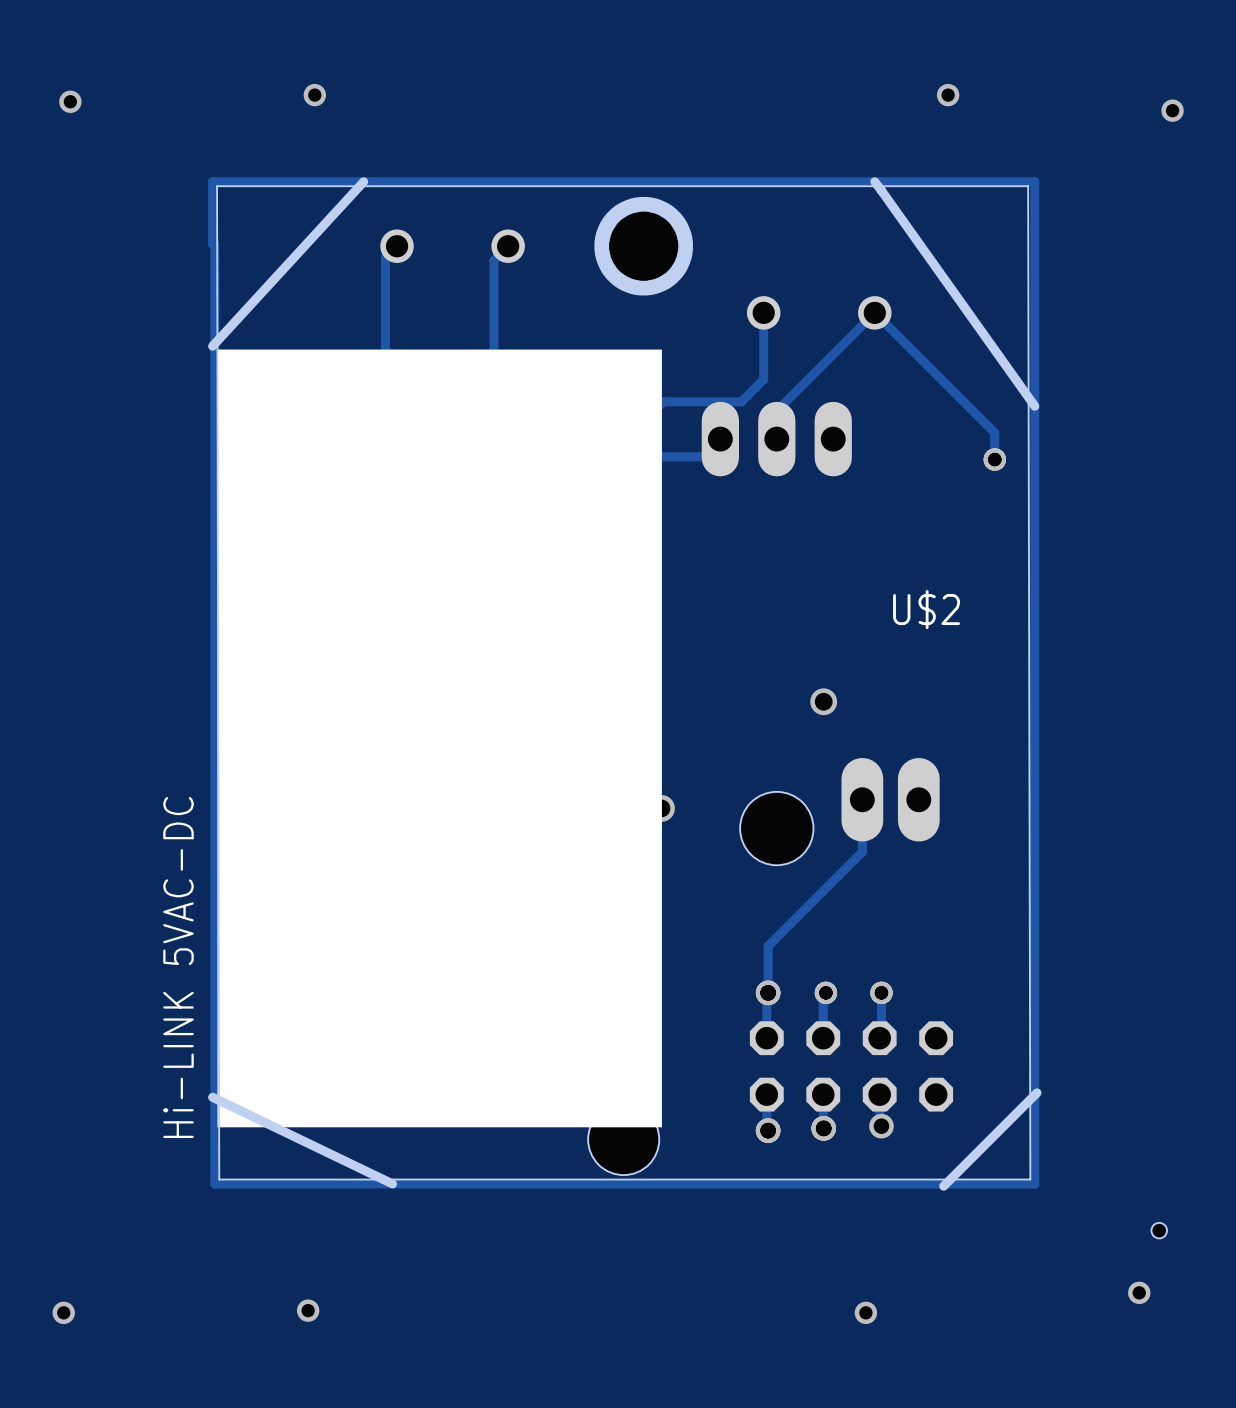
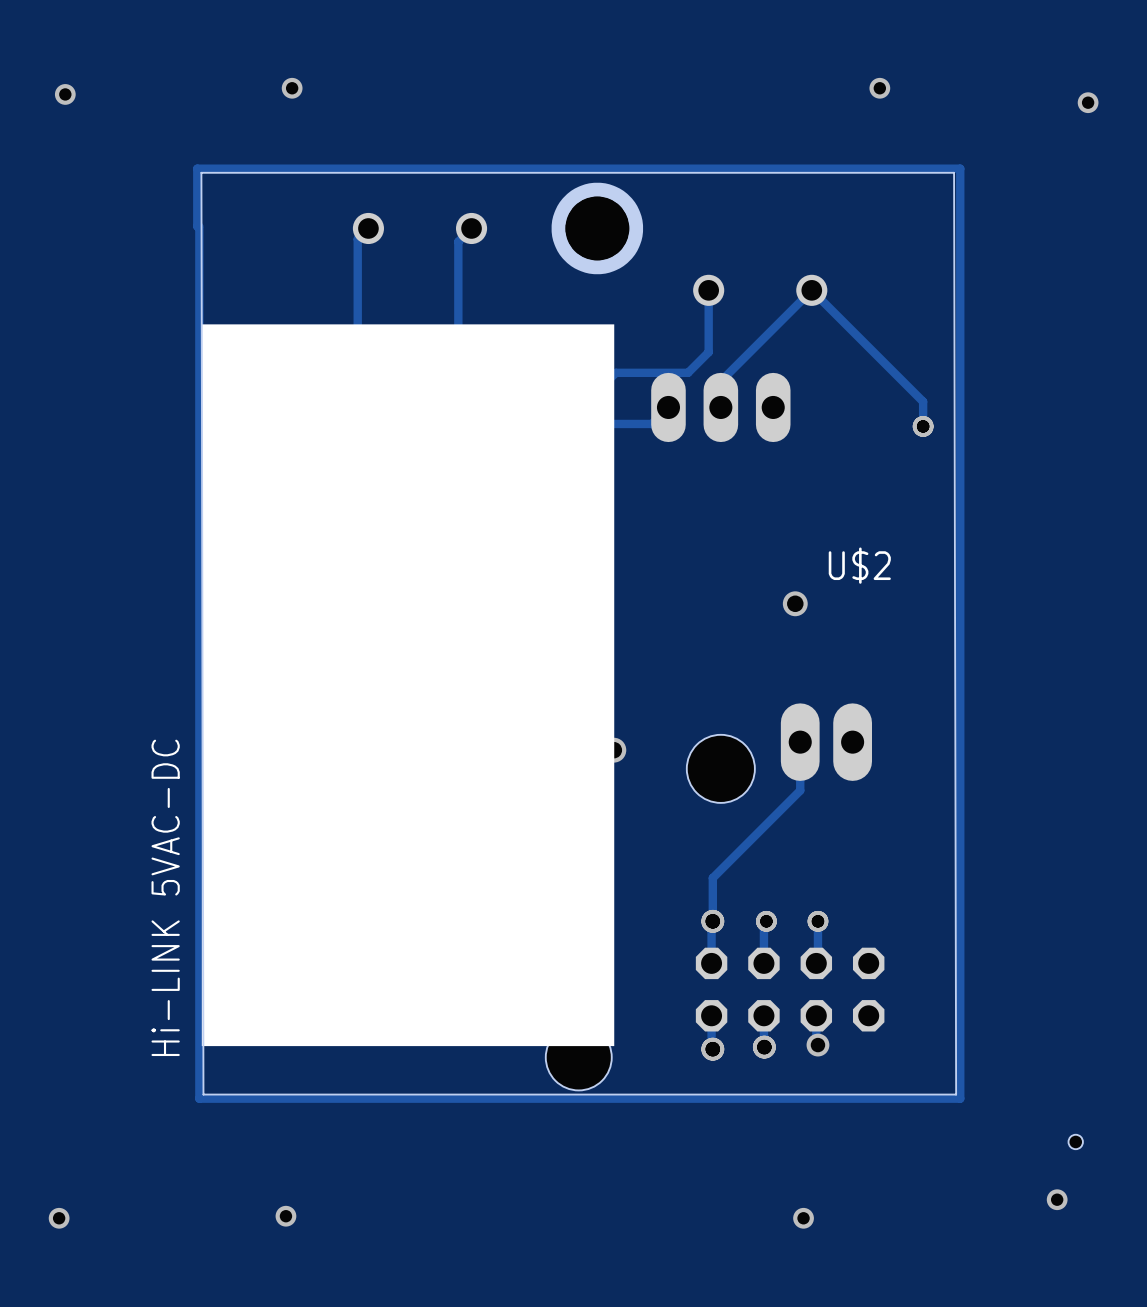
board edge: (363, 181) (212, 346) -> none
board edge: (874, 181) (1034, 406) -> none
via position: (823, 701) -> (795, 603)
board edge: (1037, 1092) (943, 1186) -> none
board edge: (212, 1097) (392, 1183) -> none

